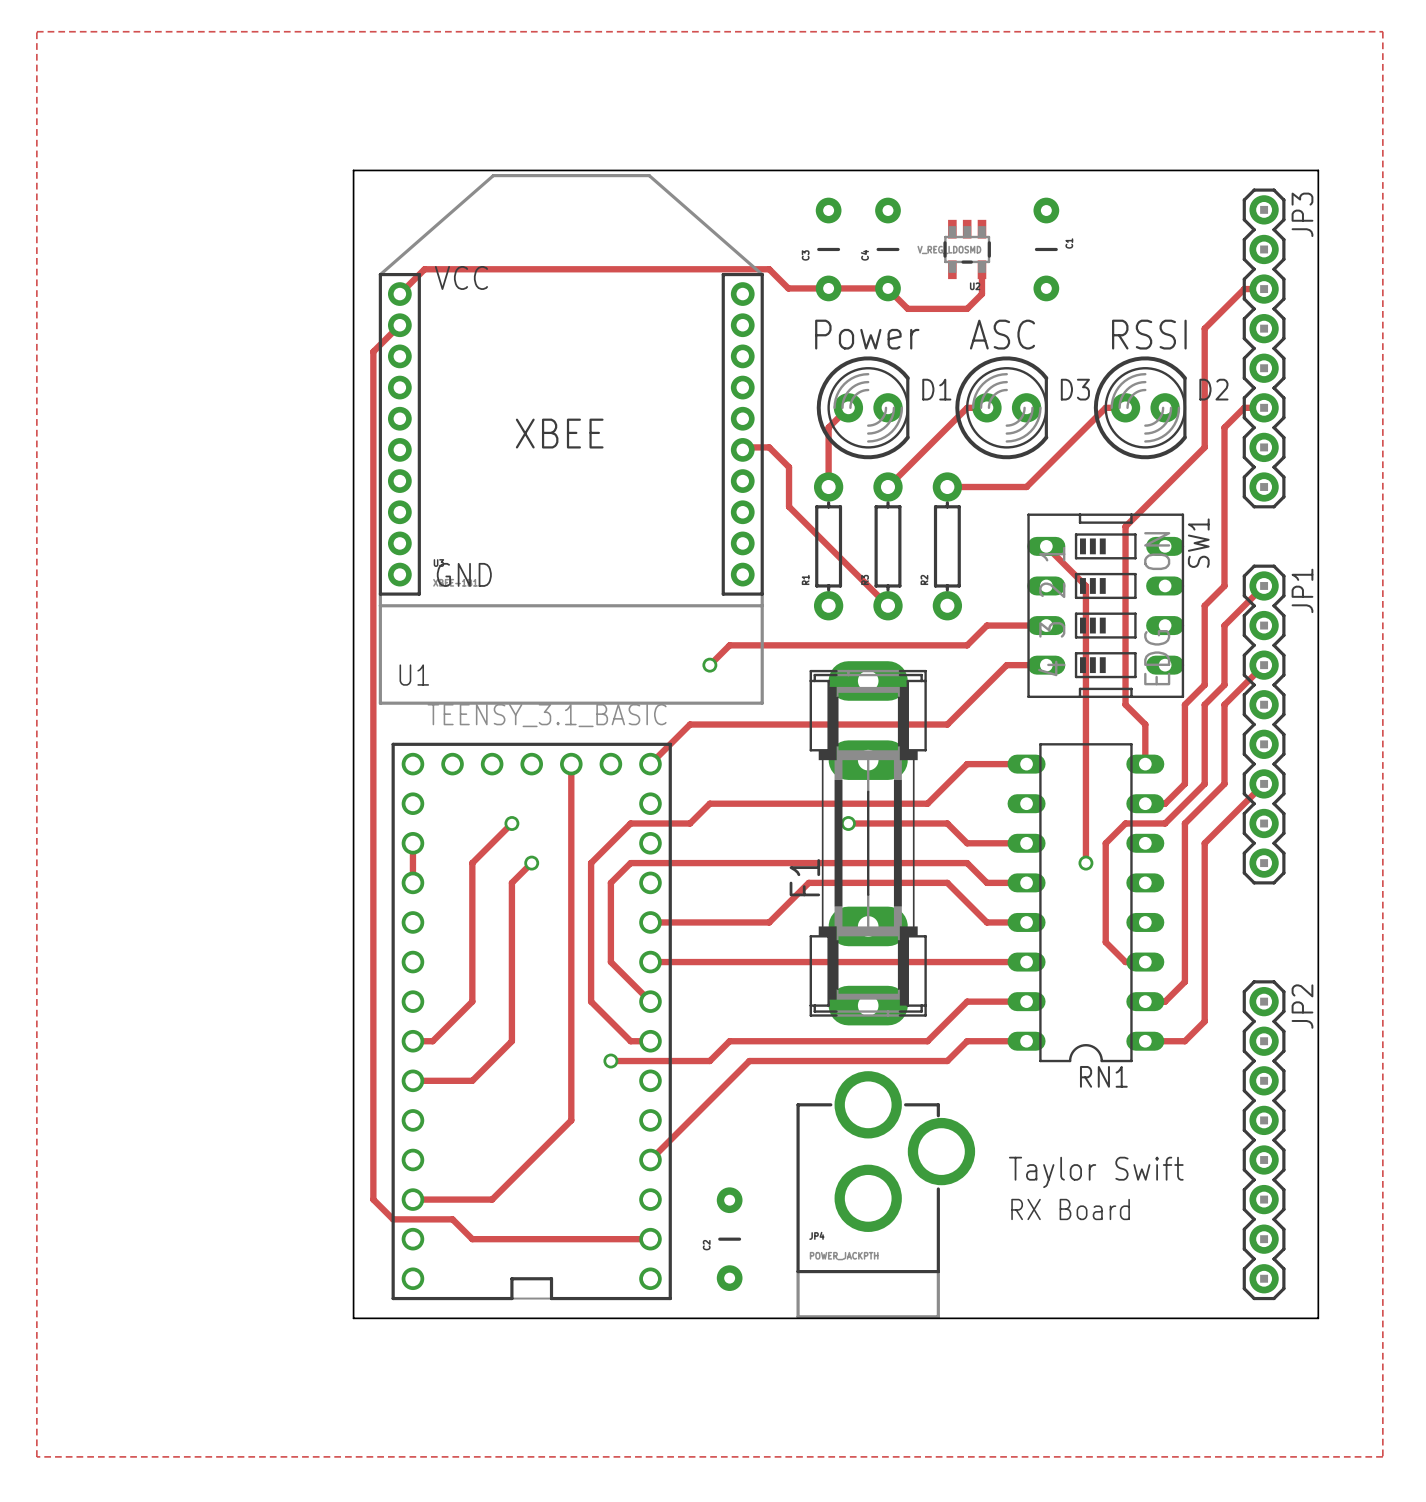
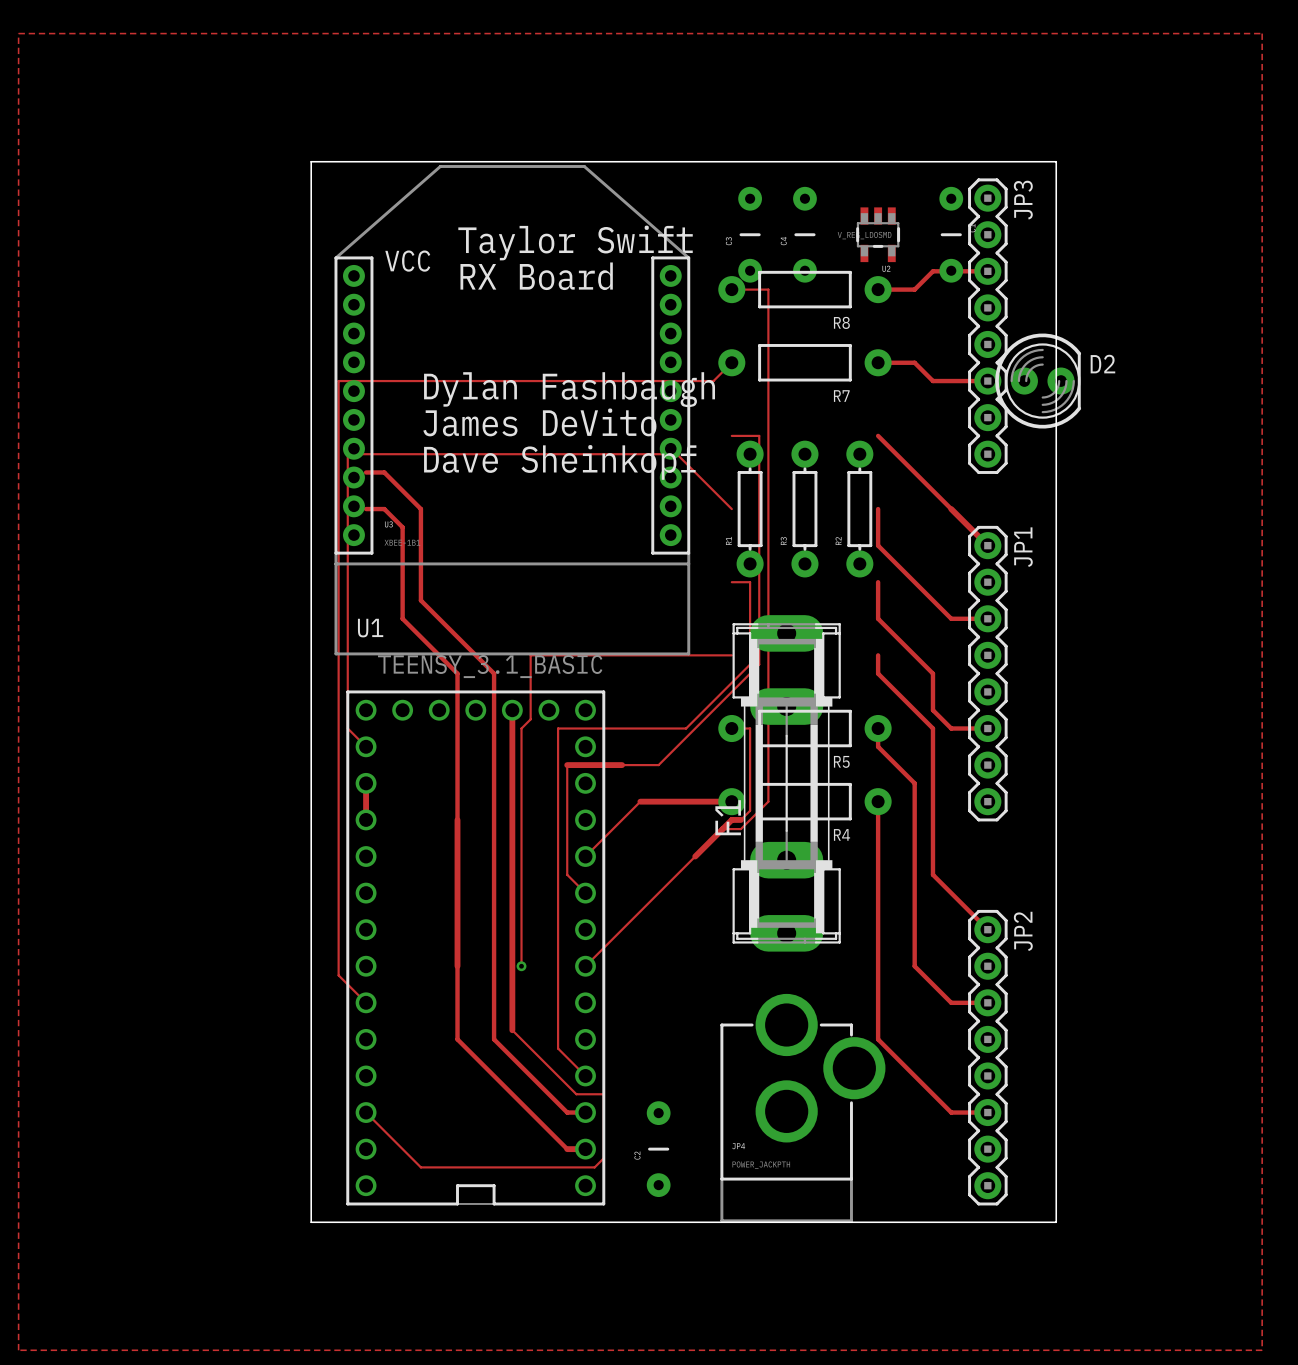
board edge: (1159, 170) (1318, 170) (1318, 1318) (1159, 1318) -> (1056, 161) (1056, 1222)
text: none -> Taylor Swift (575, 242)
track: (981, 269) (981, 294) (967, 308) (907, 308) (888, 288) (788, 288) (769, 269) (424, 269) (399, 294) -> none
track: none -> (987, 271) (932, 271) (914, 289) (878, 289)
track: (1264, 289) (1244, 289) (1204, 328) (1204, 447) (1125, 526) (1125, 704) (1145, 724) (1145, 764) -> none
text: none -> RX Board (536, 276)
track: none -> (731, 289) (768, 289) (768, 801) (740, 829) (722, 829)
R8: none -> (804, 289)
track: (399, 325) (373, 351) (373, 1199) (393, 1219) (452, 1219) (472, 1239) (630, 1239) -> none
text: Power (867, 334) -> none
text: ASC (1002, 334) -> none
text: RSSI (1149, 334) -> none
JP3 position: (1264, 348) -> (987, 326)
track: none -> (731, 362) (713, 381) (338, 381) (338, 975) (366, 1002)
R7: none -> (804, 362)
track: none -> (878, 362) (914, 362) (932, 381) (987, 381)
track: (848, 407) (828, 427) (828, 487) -> none
D1: (863, 407) -> none
track: (986, 407) (967, 407) (888, 487) -> none
D3: (1001, 407) -> none
track: (1125, 407) (1105, 407) (1026, 487) (947, 487) -> none
track: (1264, 407) (1244, 407) (1224, 427) (1224, 585) (1204, 605) (1204, 684) (1184, 704) (1184, 783) (1165, 803) (1145, 803) -> none
text: none -> Dylan Fashbaugh (569, 389)
text: XBEE (559, 433) -> none
track: (742, 449) (745, 447) (769, 447) (789, 467) (789, 506) (888, 605) -> none
text: none -> James DeVito (539, 422)
track: none -> (878, 435) (951, 509)
text: none -> Dave Sheinkopf (560, 462)
track: none -> (366, 472) (384, 472) (420, 509) (420, 600) (494, 673) (494, 1039) (567, 1112) (585, 1112)
track: none -> (731, 509) (676, 454) (347, 454) (347, 728) (366, 746)
track: none -> (878, 509) (878, 545) (951, 618) (987, 618)
text: GND (464, 574) -> none
track: (1085, 585) (1085, 863) -> none
track: (1264, 585) (1224, 625) (1224, 684) (1204, 704) (1204, 783) (1165, 823) (1125, 823) (1105, 843) (1105, 942) (1125, 962) (1145, 962) -> none
SW1: (1105, 605) -> none
track: none -> (878, 582) (878, 618) (932, 673) (932, 710) (951, 728) (987, 728)
track: (1046, 625) (986, 625) (967, 645) (729, 645) (709, 665) -> none
via: (709, 665) -> none
track: (1046, 665) (1006, 665) (947, 724) (690, 724) (650, 764) -> none
track: (1264, 665) (1224, 704) (1224, 783) (1184, 823) (1184, 981) (1165, 1001) (1145, 1001) -> none
track: none -> (731, 655) (530, 655) (530, 719) (521, 728) (521, 966)
track: none -> (878, 655) (878, 673) (932, 728) (932, 874) (987, 929)
JP1 position: (1264, 724) -> (987, 673)
track: (1026, 764) (967, 764) (927, 803) (709, 803) (690, 823) -> (731, 435) (759, 435) (759, 664) (658, 765) (622, 765)
R5: none -> (804, 728)
track: none -> (878, 728) (878, 746) (914, 783) (914, 966) (951, 1002) (987, 1002)
track: (1264, 783) (1204, 843) (1204, 1021) (1184, 1041) (1145, 1041) -> none
track: (511, 823) (472, 863) (472, 1001) (432, 1041) (412, 1041) -> none
via: (511, 823) -> none
track: (630, 823) (591, 863) (591, 1001) (630, 1041) (650, 1041) -> (567, 765) (567, 874) (585, 893)
track: (848, 823) (947, 823) (967, 843) (1026, 843) -> none
via: (848, 823) -> none
track: (531, 863) (511, 882) -> (366, 509) (384, 509) (402, 527) (402, 618) (457, 673) (457, 819)
via: (531, 863) -> none
track: (709, 863) (630, 863) (610, 882) (610, 962) (650, 1001) -> (640, 801) (585, 856)
track: (808, 863) (967, 863) (986, 882) (1026, 882) -> none
R4: none -> (804, 801)
track: none -> (878, 801) (878, 1039) (951, 1112) (987, 1112)
via: (1085, 863) -> none
track: (818, 882) (947, 882) (986, 922) (1026, 922) -> (740, 819) (750, 810) (750, 728) (731, 728)
RN1: (1085, 902) -> none
track: (650, 922) (769, 922) -> (585, 966) (695, 856)
track: (650, 962) (1026, 962) -> none
track: (1026, 1001) (967, 1001) (927, 1041) (729, 1041) (709, 1061) (610, 1061) -> none
track: (511, 1041) (472, 1080) (412, 1080) -> (457, 966) (457, 1039) (567, 1149)
via: none -> (521, 966)
track: (1026, 1041) (967, 1041) (947, 1061) (749, 1061) (650, 1159) -> (731, 582) (750, 582) (750, 664) (686, 728) (558, 728) (558, 1048) (585, 1075)
via: (610, 1061) -> none
track: (571, 1110) (571, 1120) (492, 1199) (412, 1199) -> (512, 1030) (576, 1094) (603, 1094) (603, 1158) (594, 1167) (420, 1167) (366, 1112)
JP2 position: (1264, 1140) -> (987, 1057)
text: Taylor Swift (1096, 1172) -> none
text: RX Board (1070, 1209) -> none

